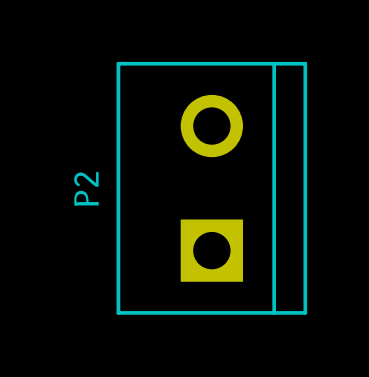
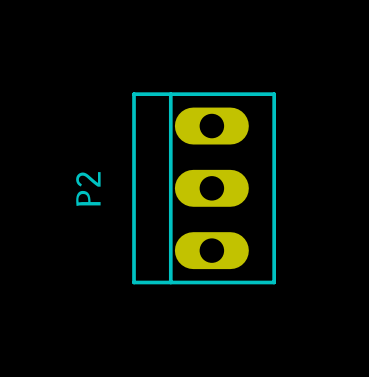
P2 footprint: [116, 61, 308, 315] -> [132, 92, 277, 285]

